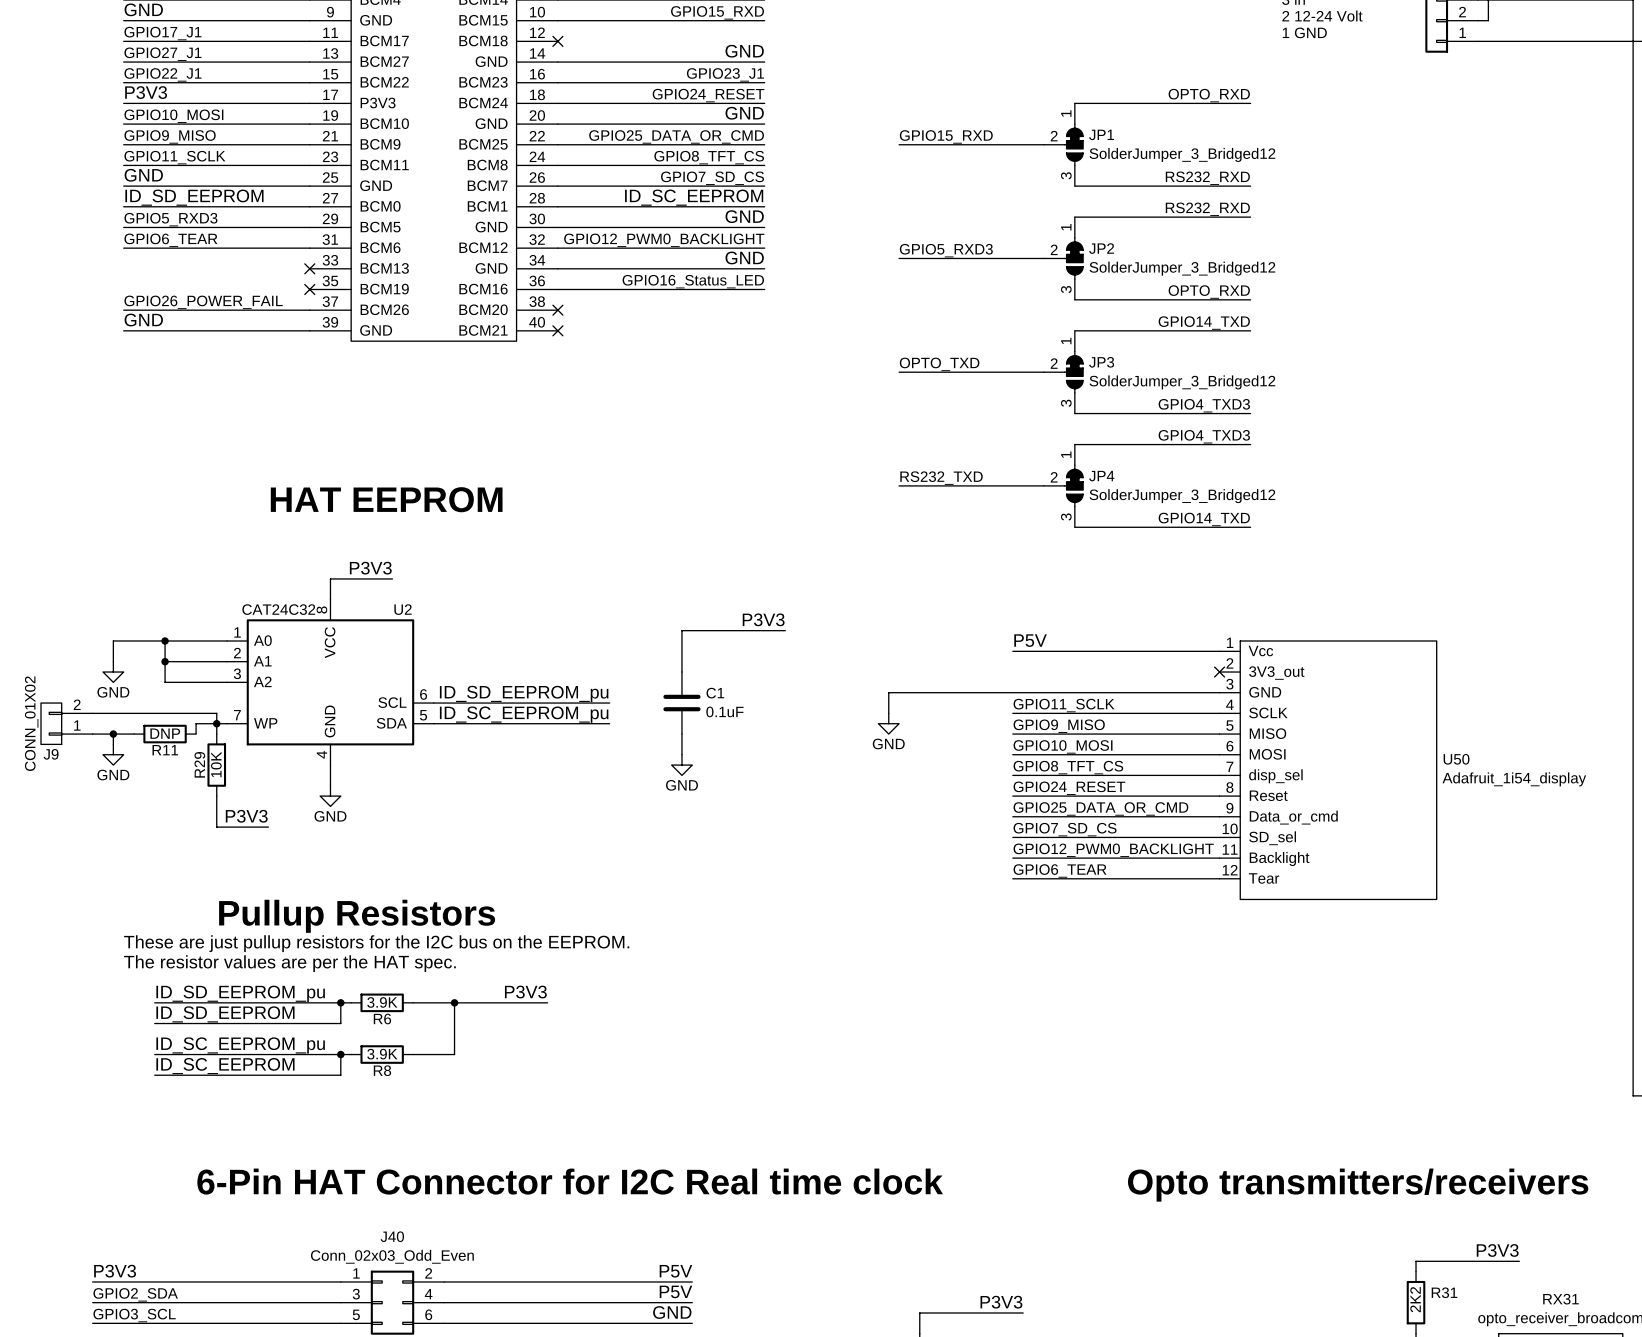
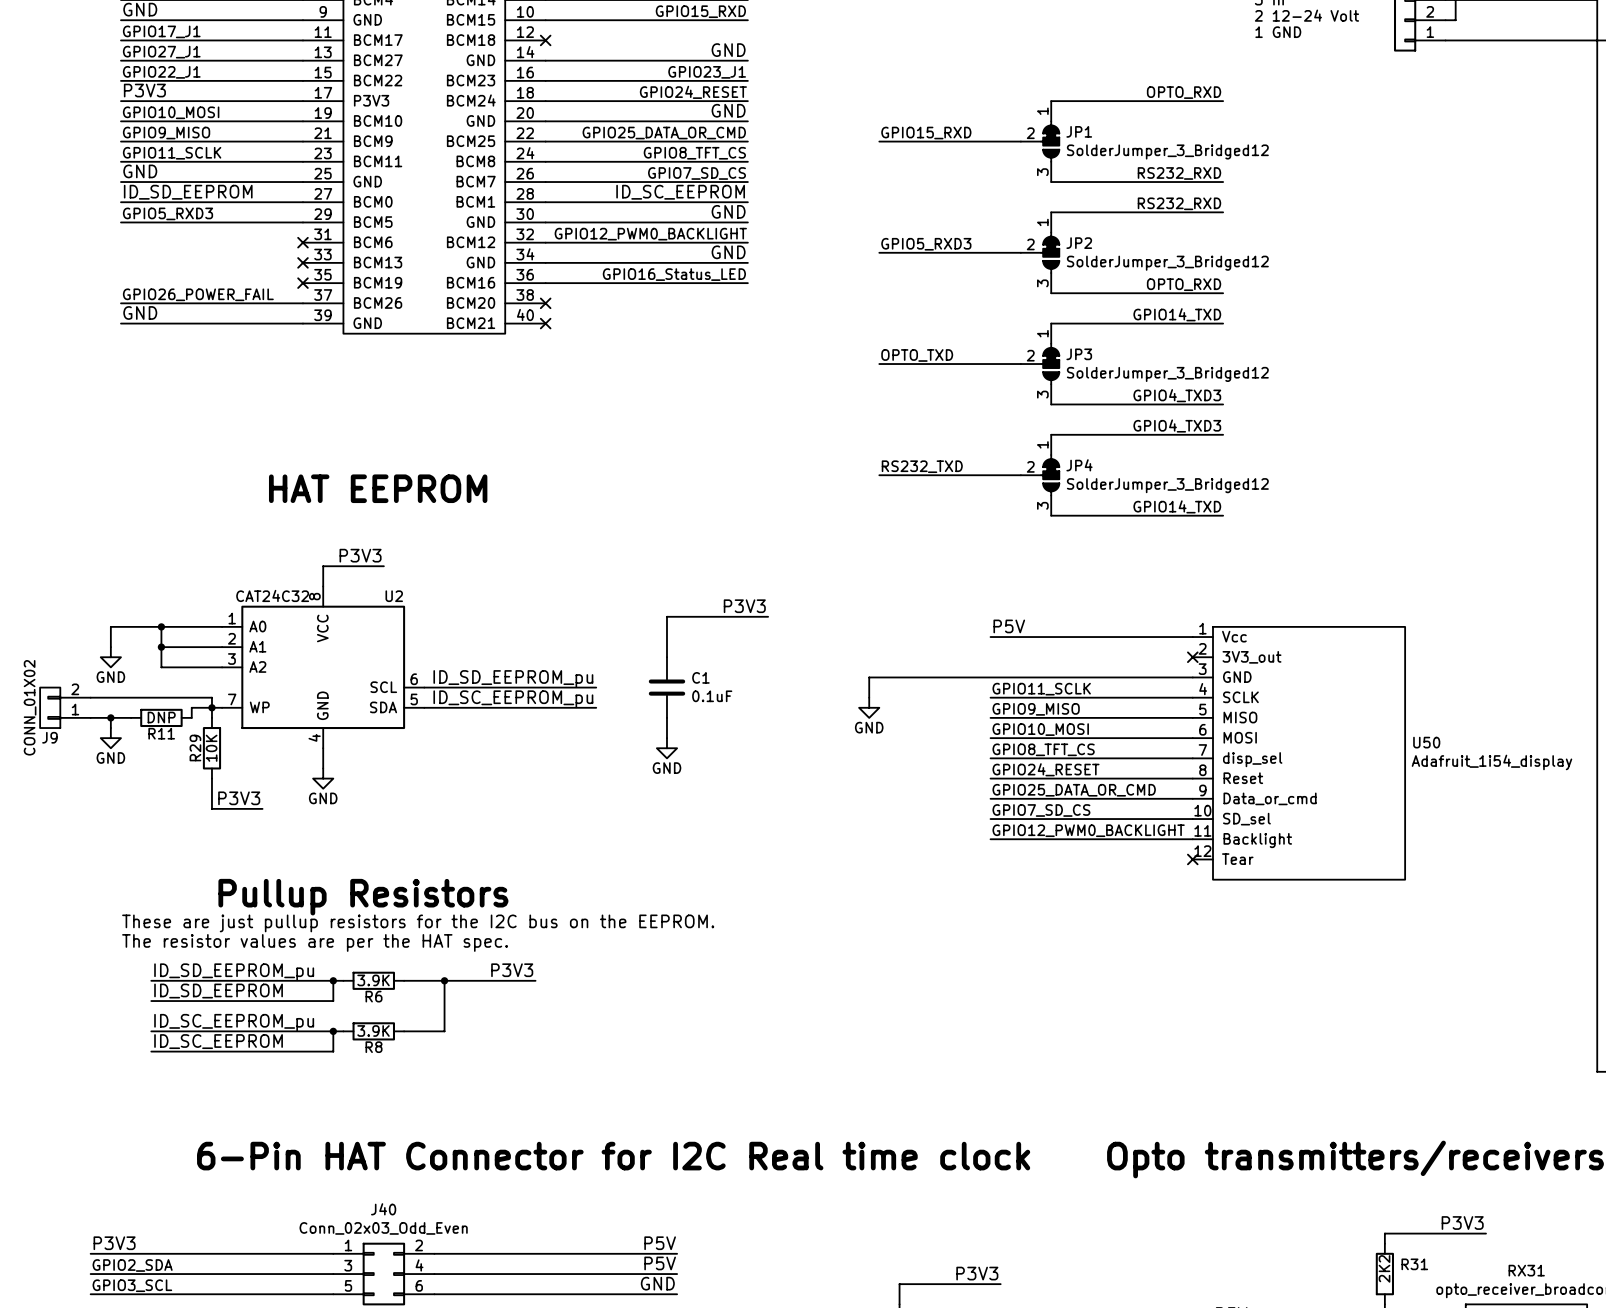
label: GPIO6_TEAR (170, 240) -> none
wire: (123, 248) (309, 248) -> none
no-connect mark: none -> (302, 242)
label: GPIO6_TEAR (1060, 870) -> none
wire: (1012, 878) (1219, 878) -> none
no-connect mark: none -> (1192, 859)

